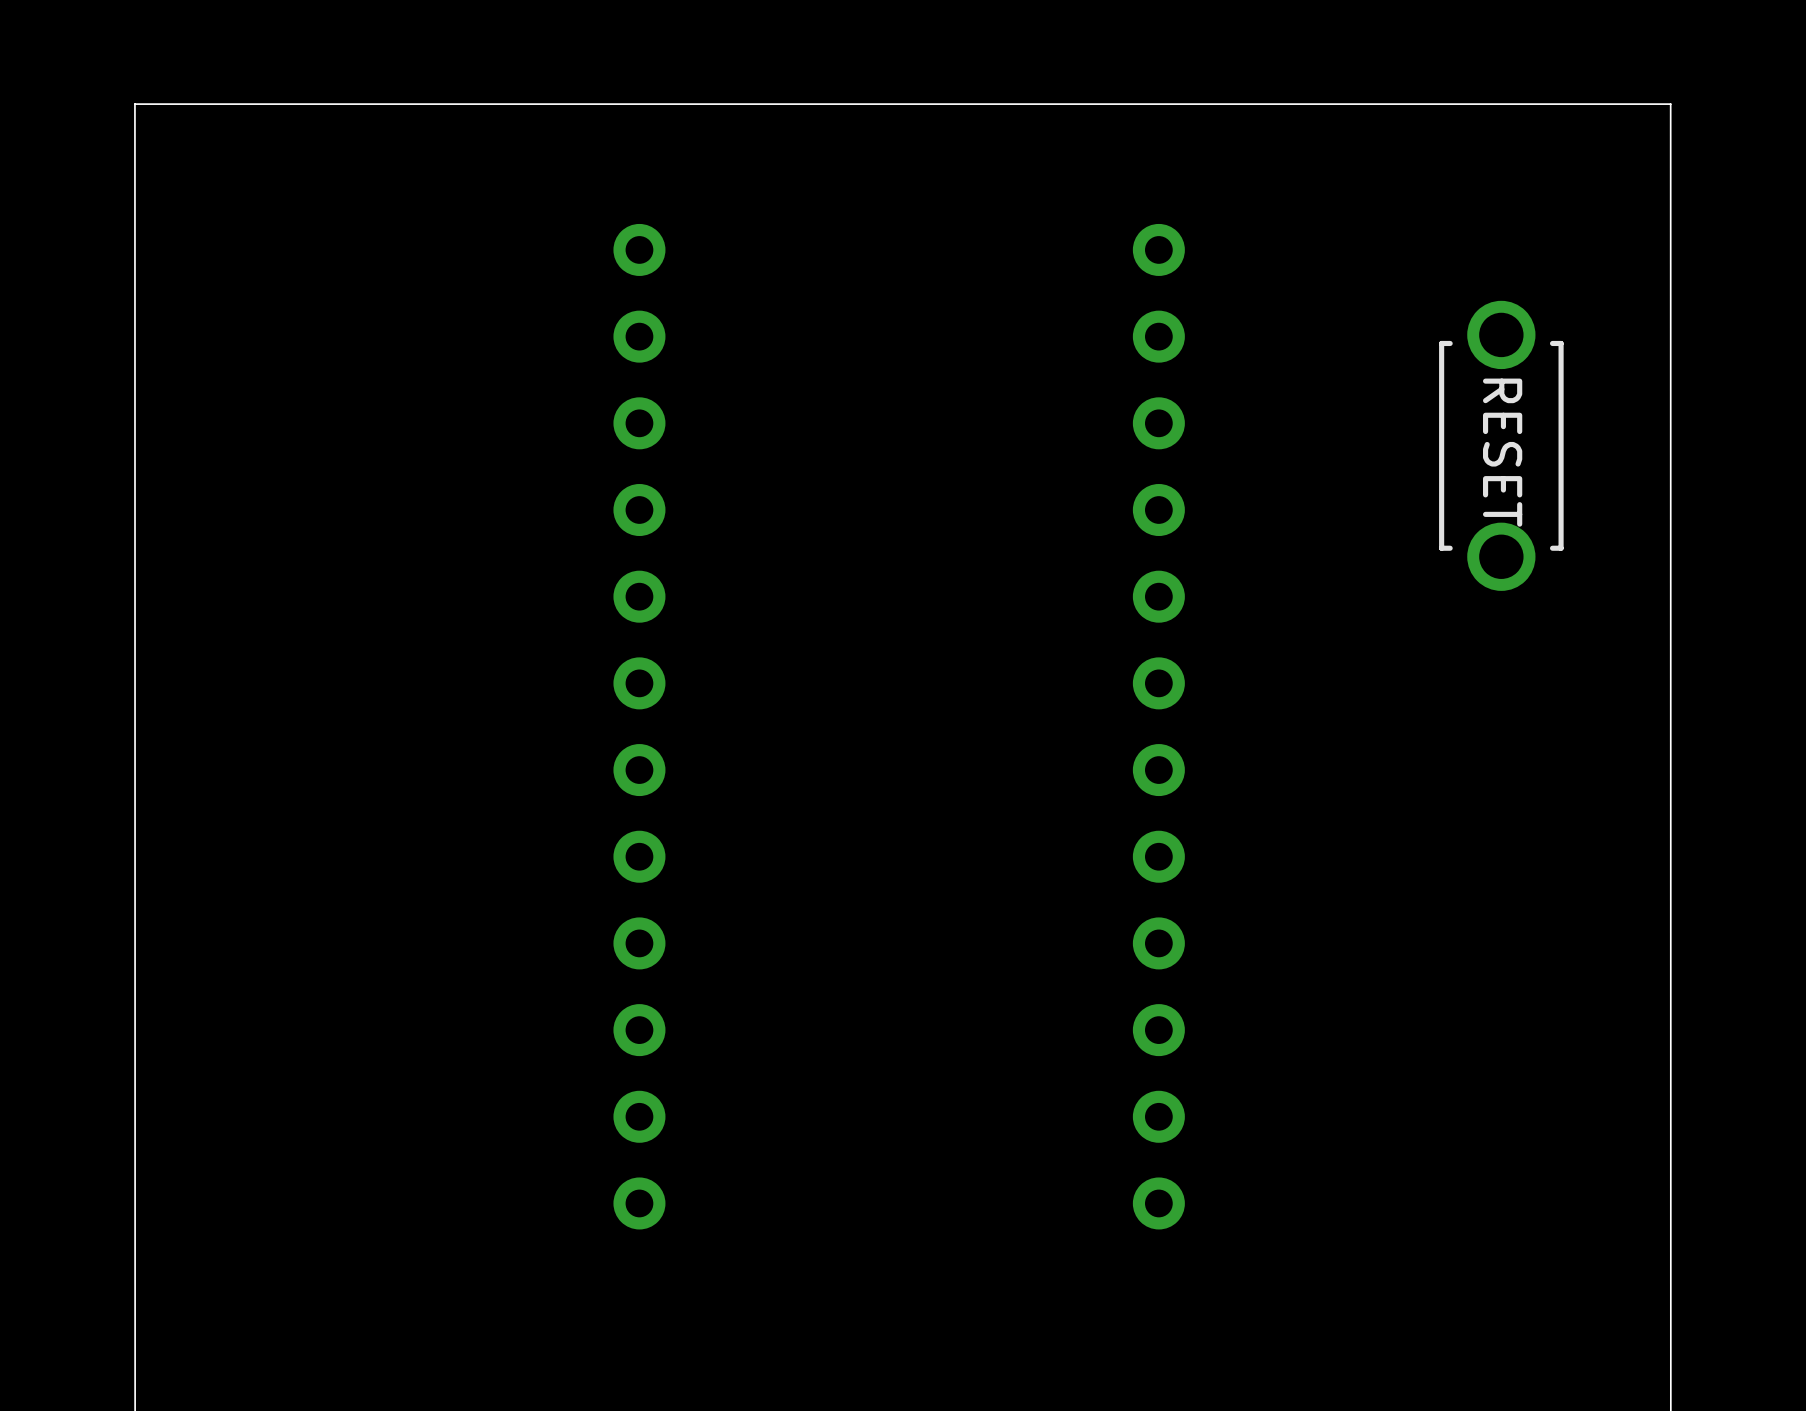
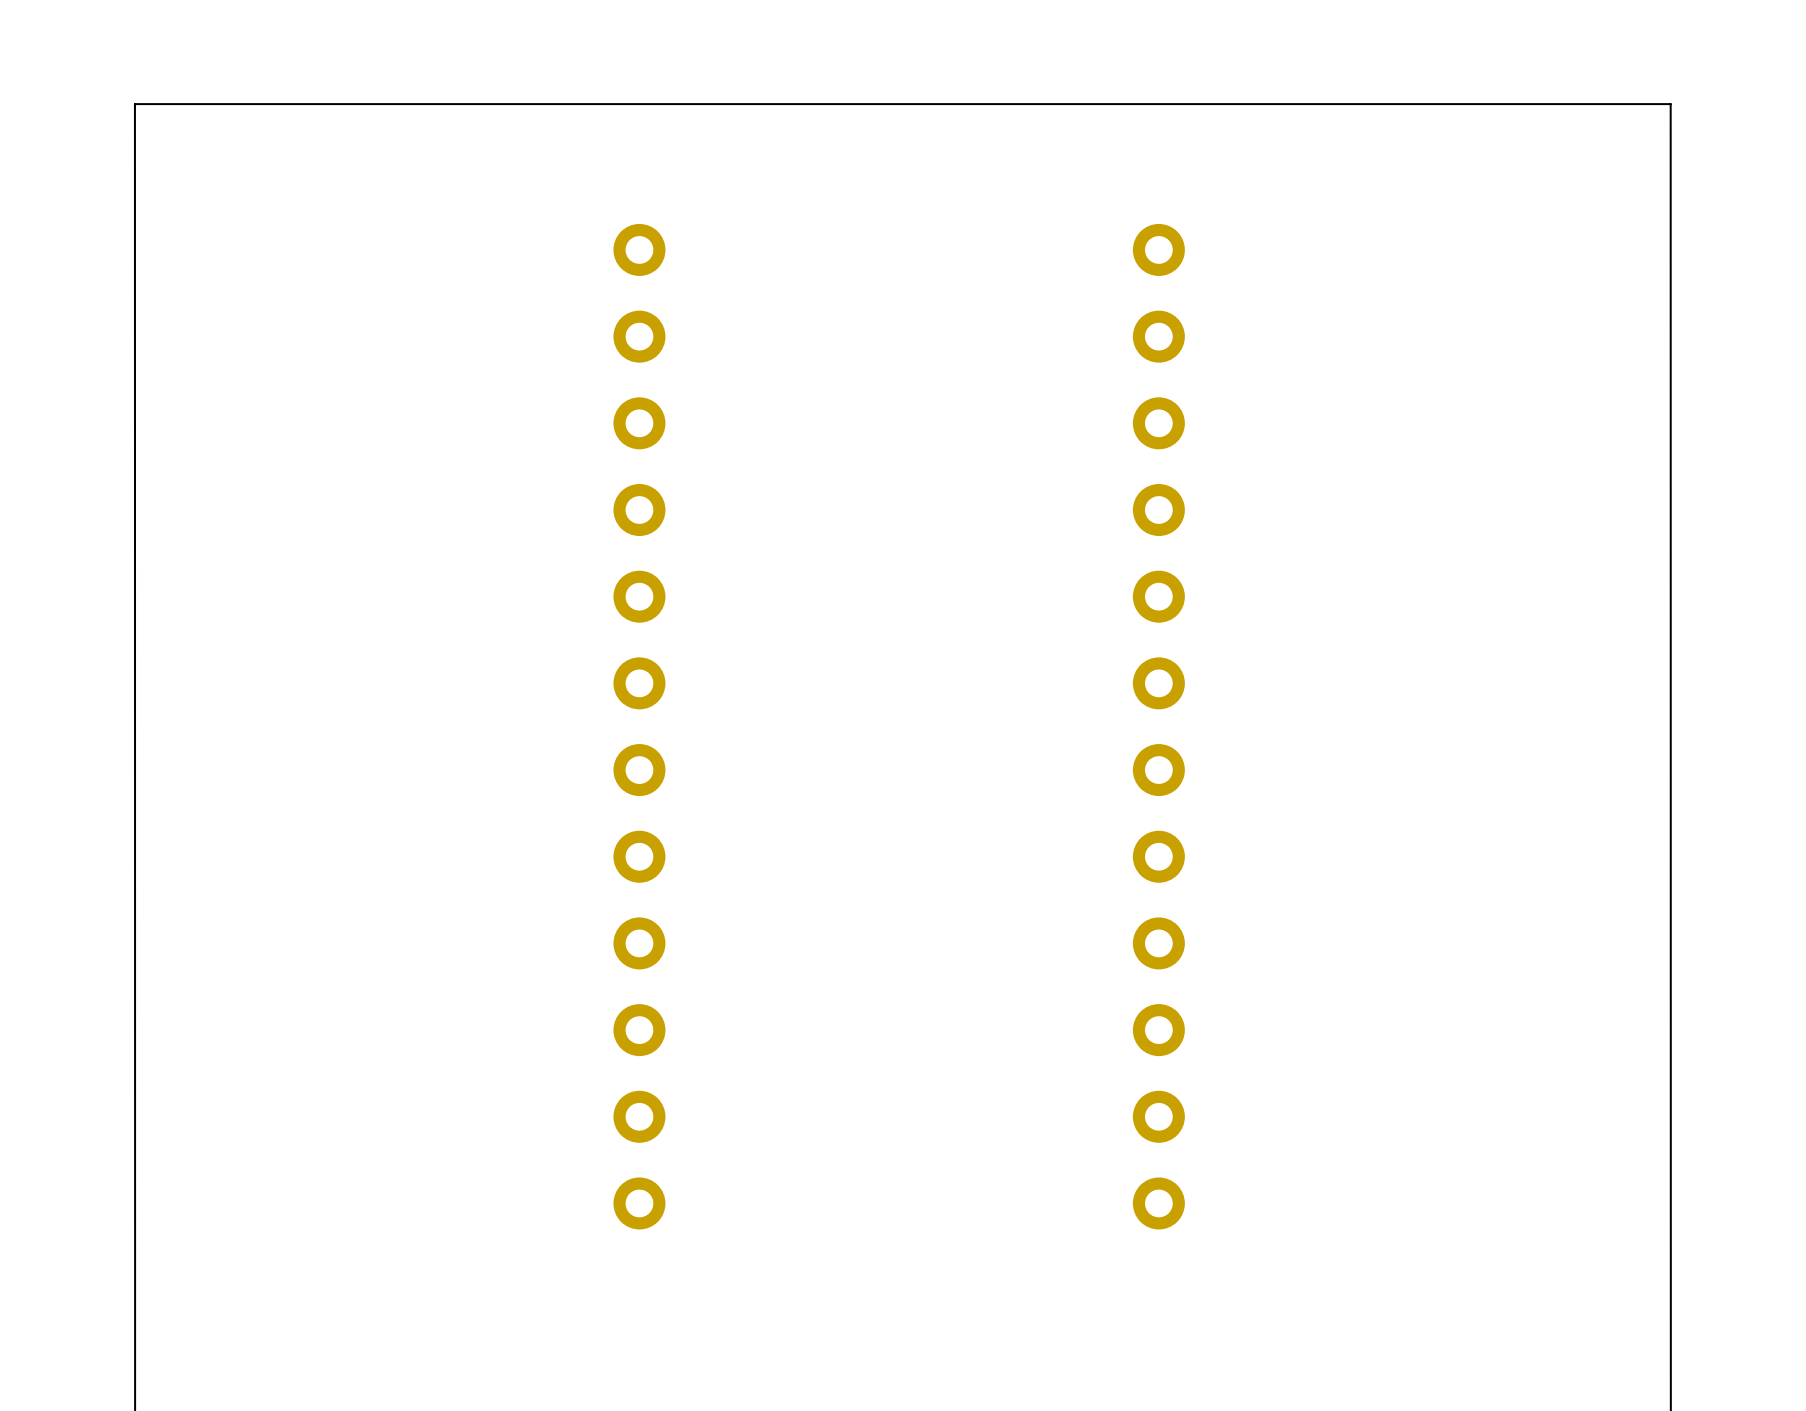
part: (1501, 445) -> none

